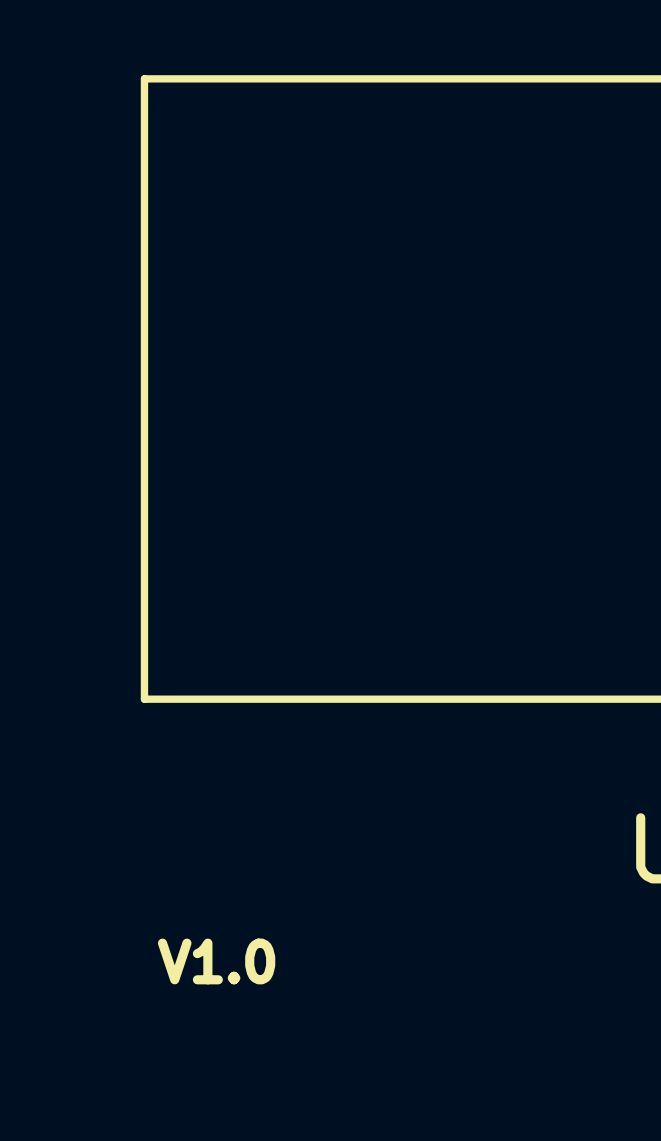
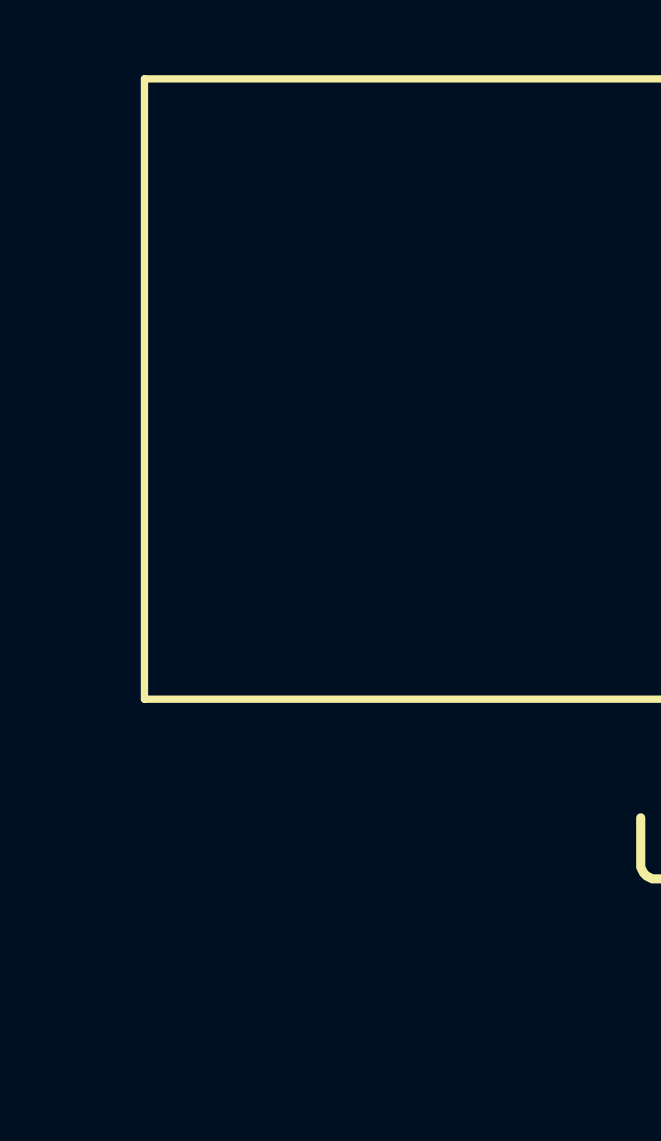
text: V1.0 (216, 961) -> none

